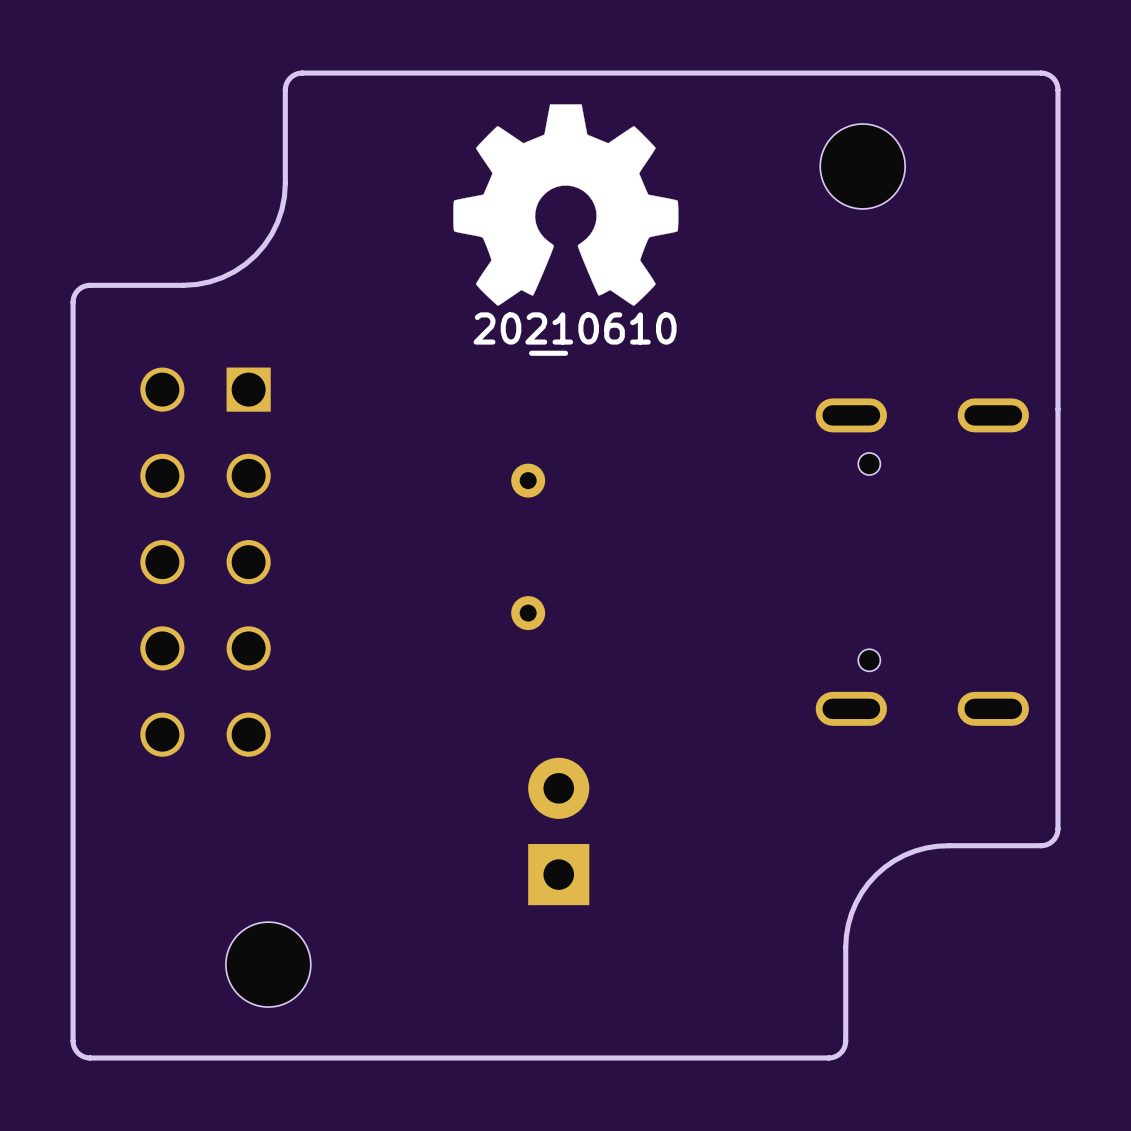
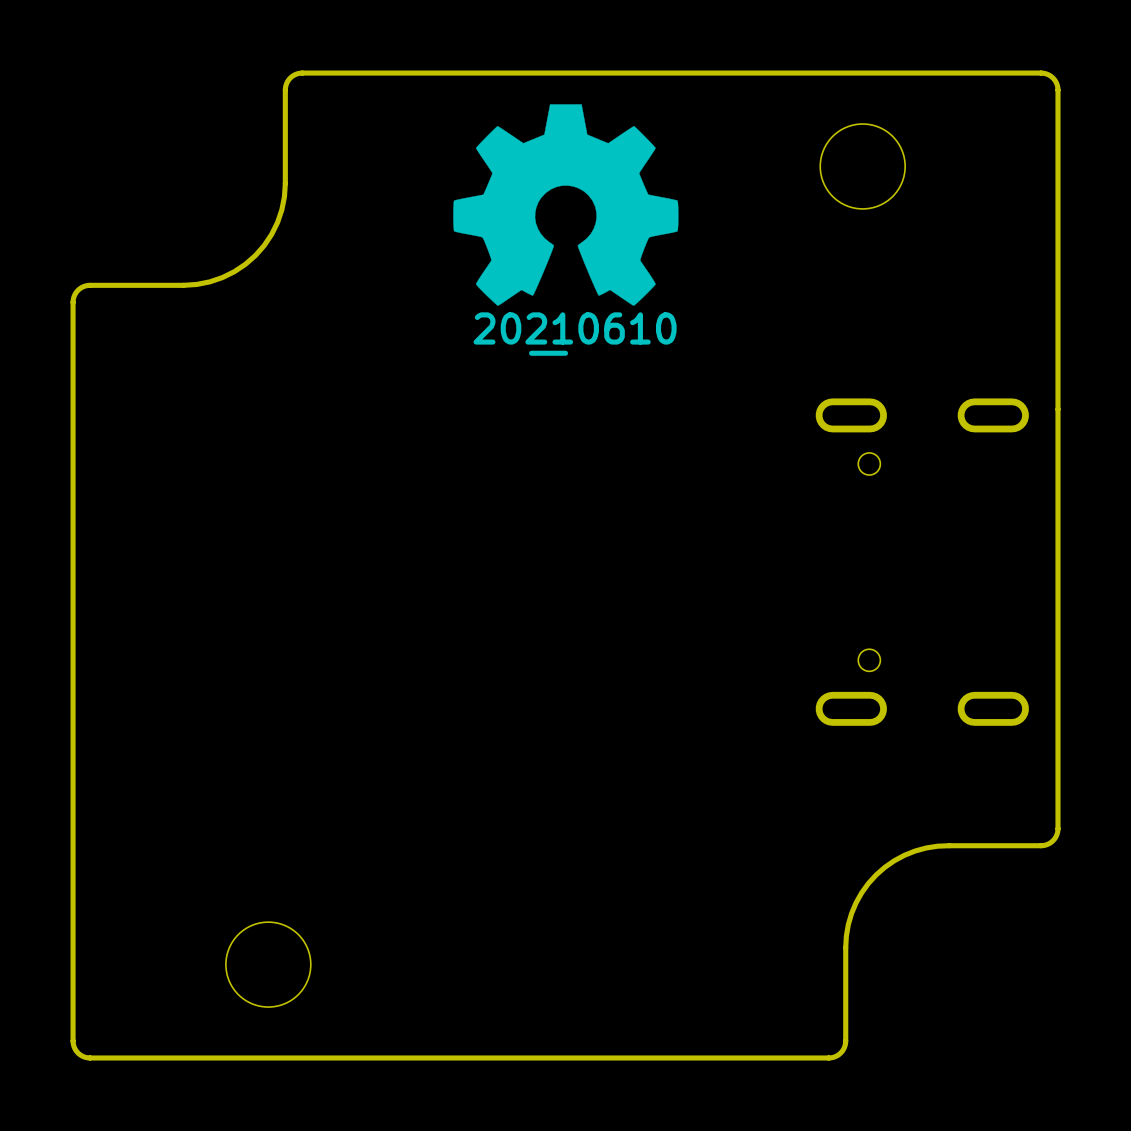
part: (528, 480) -> none
part: (205, 562) -> none
part: (528, 613) -> none
part: (558, 831) -> none

